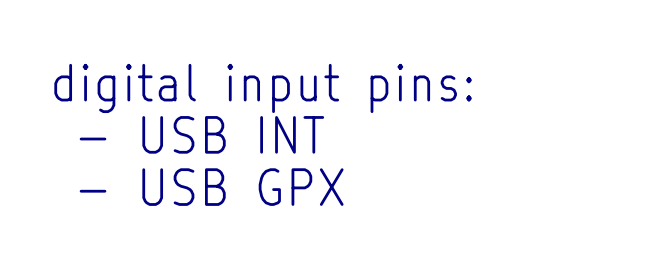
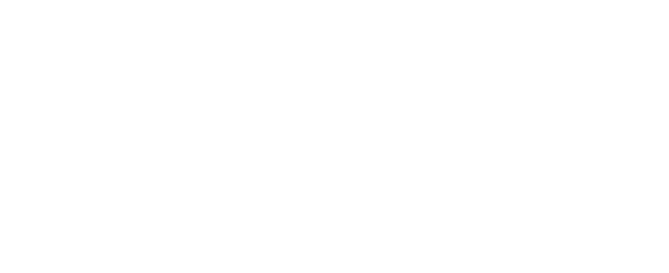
text: digital input pins: (263, 88) -> none
text: - USB INT (201, 134) -> none
text: - USB GPX (211, 187) -> none

